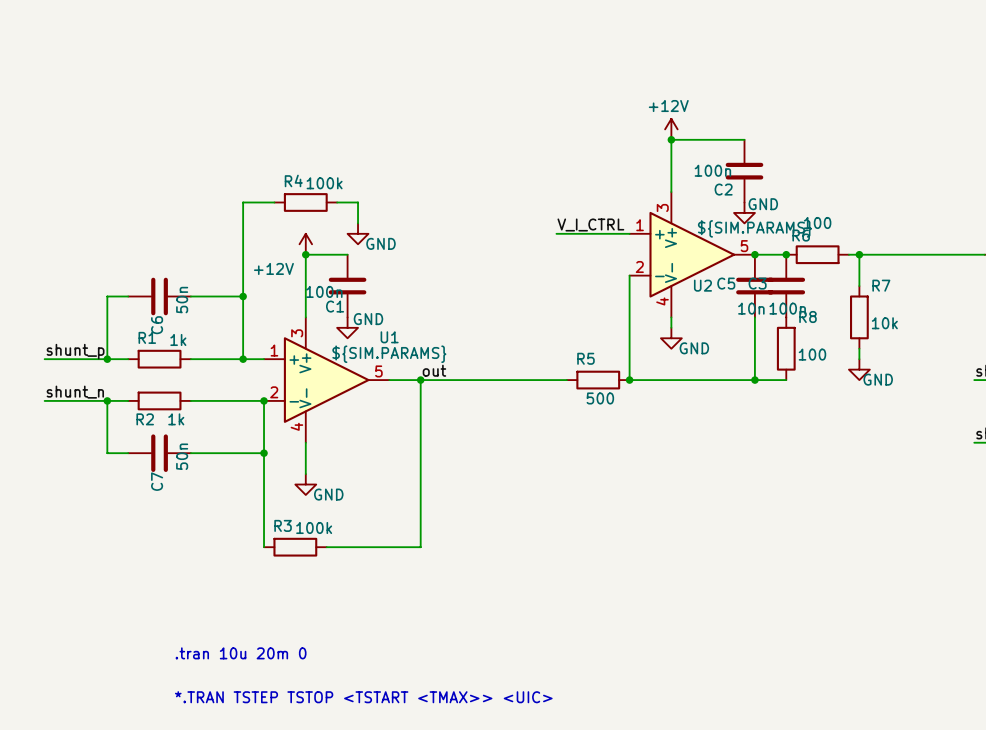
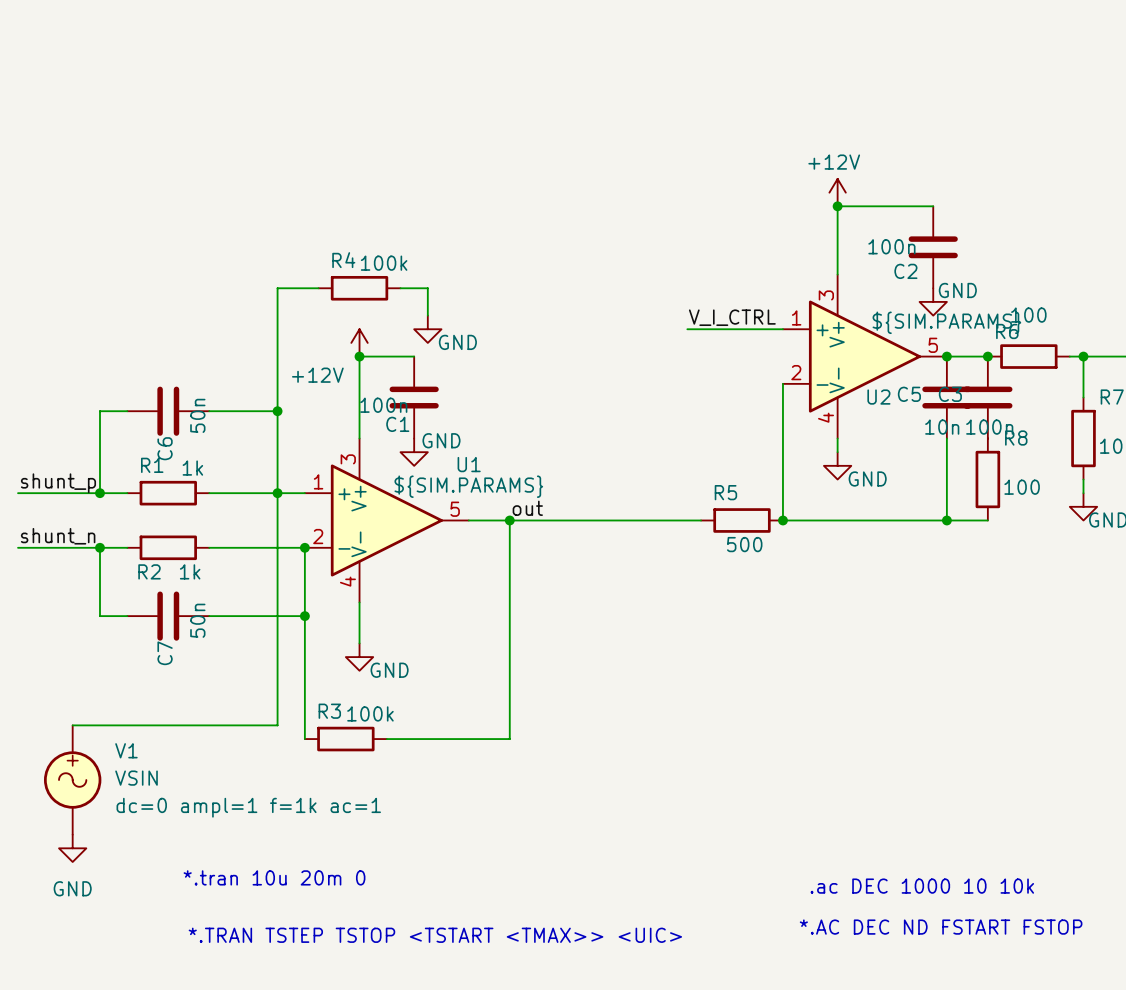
wire: none -> (277, 493) (277, 725) (72, 725)
V1: none -> VSIN (72, 780)
power symbol: none -> GND (72, 848)
text: .tran 10u 20m 0 (241, 653) -> *.tran 10u 20m 0 (274, 877)
text: none -> .ac DEC 1000 10 10k (922, 886)
text: none -> *.AC DEC ND FSTART FSTOP (941, 927)

